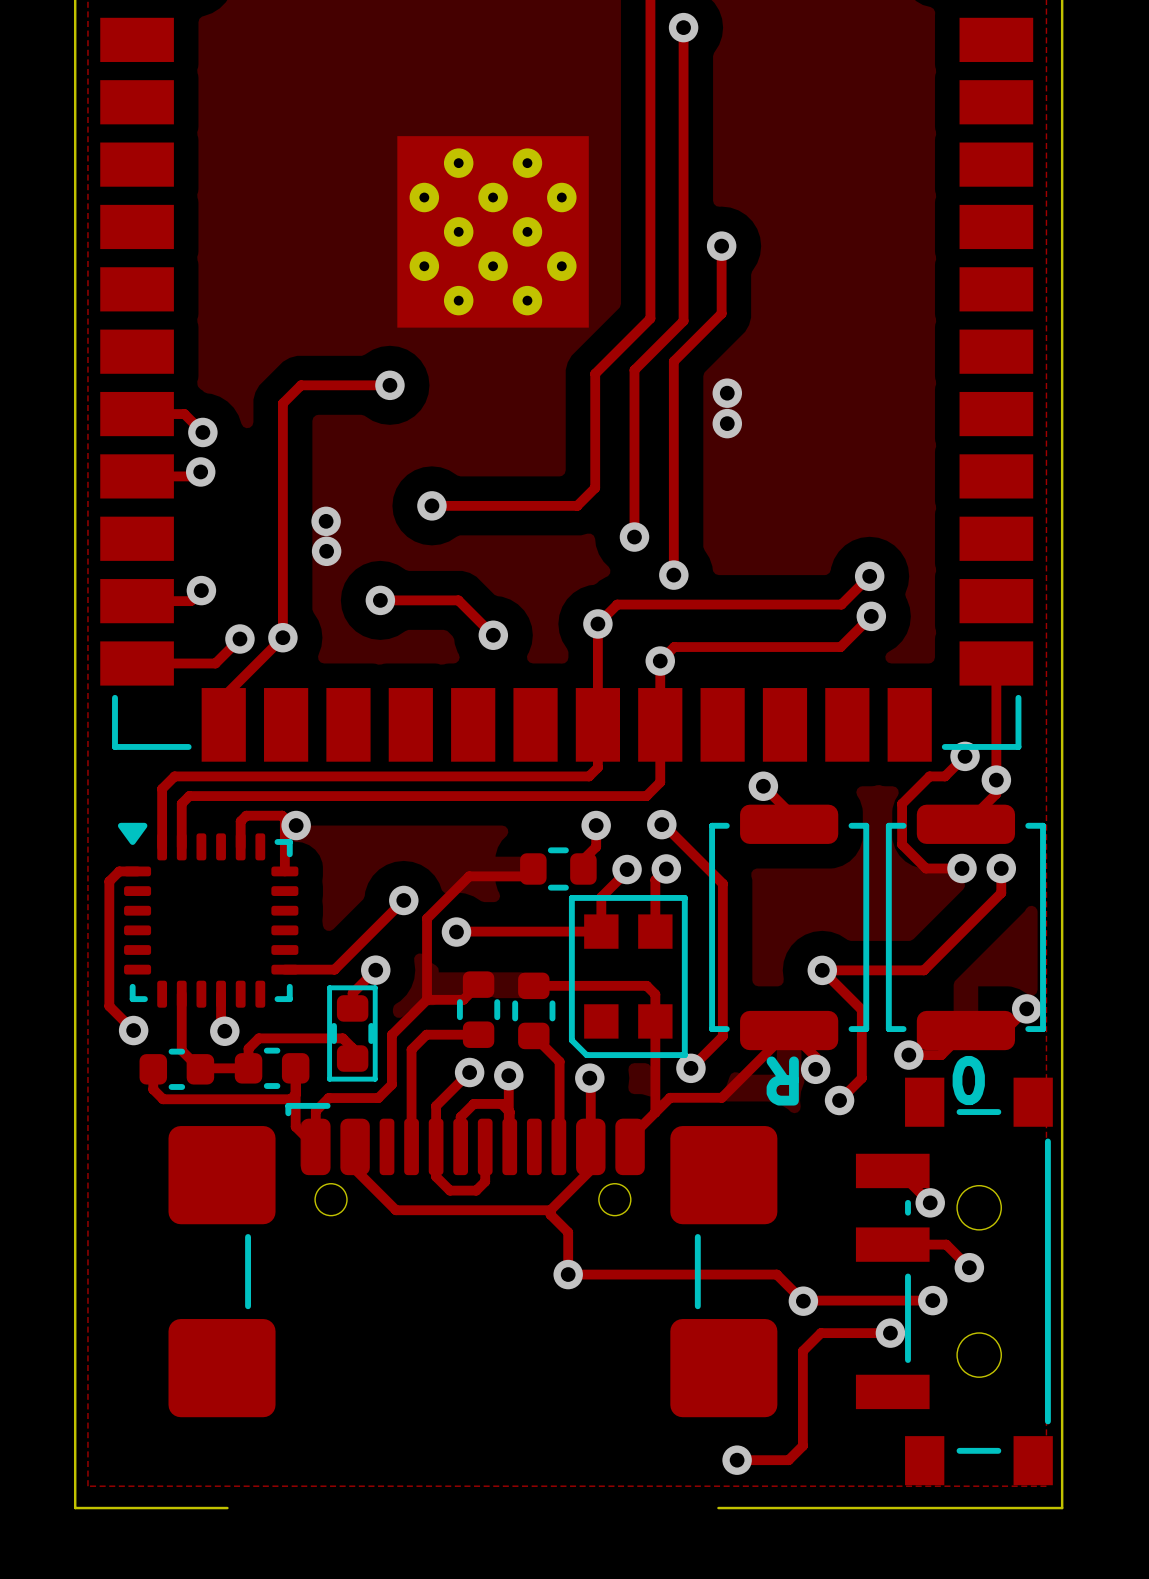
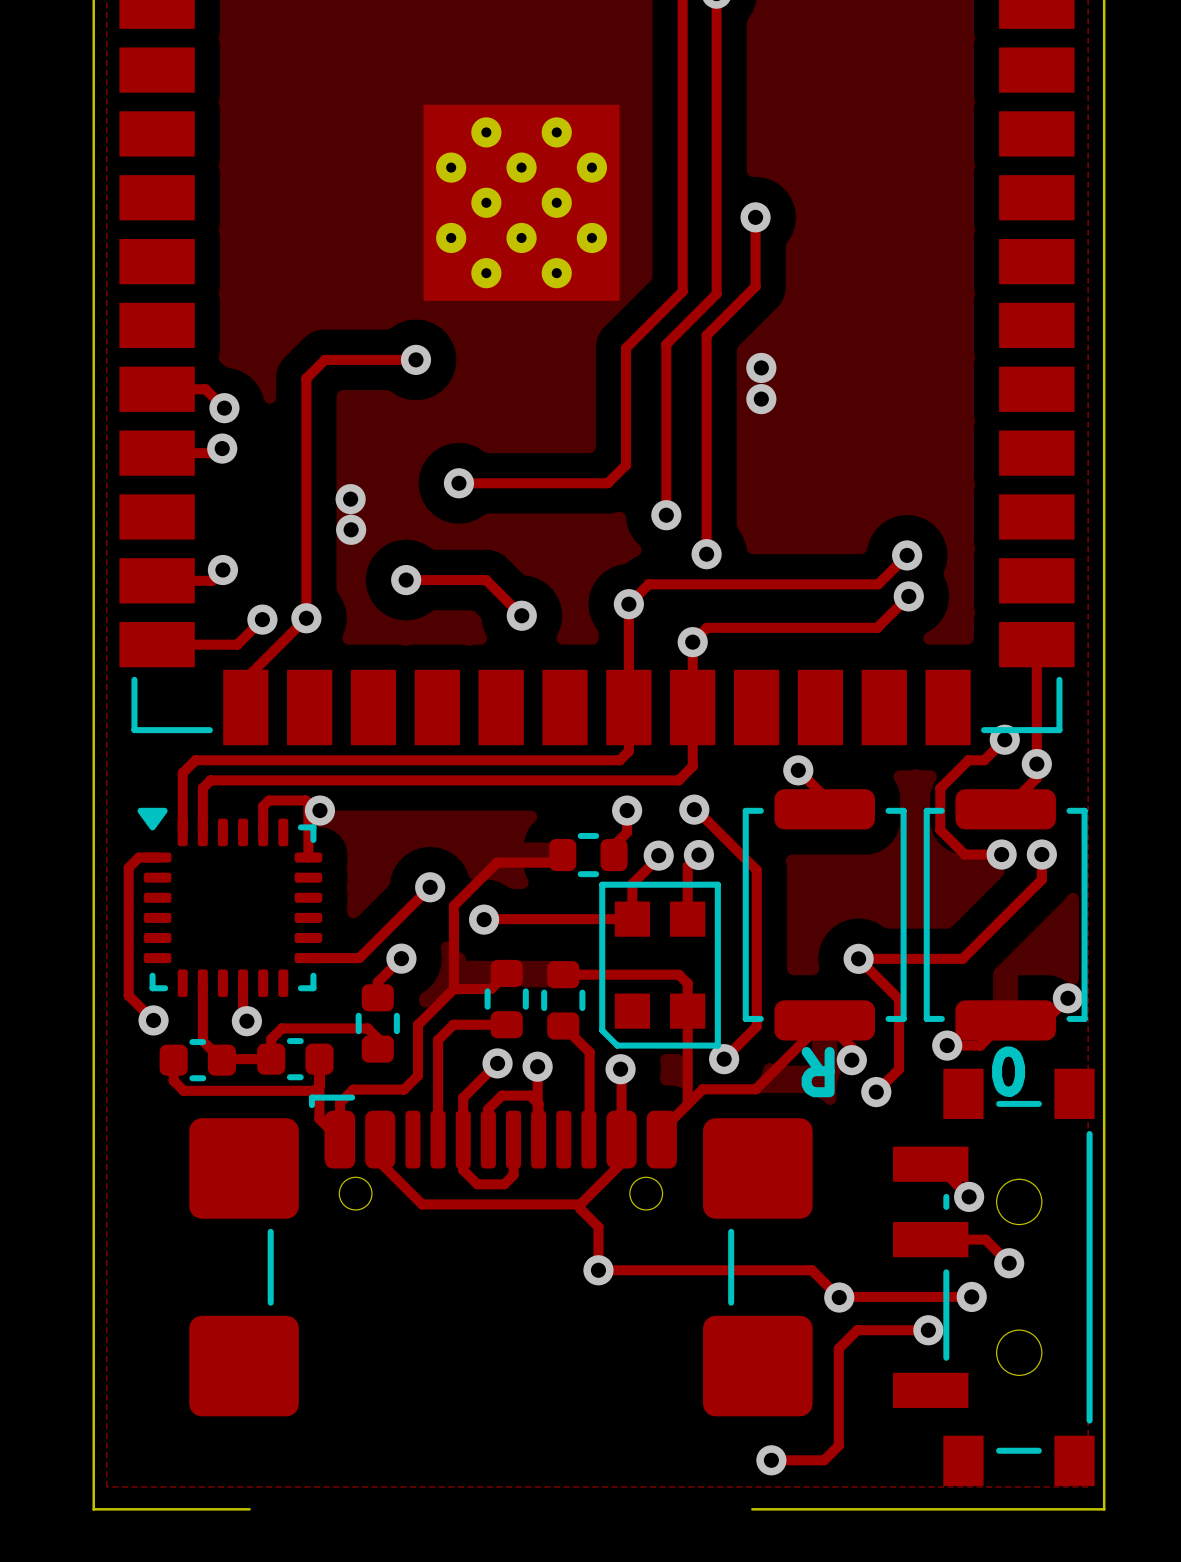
line: (329, 987) (375, 987) (375, 1079) (329, 1079) (329, 987) -> none

